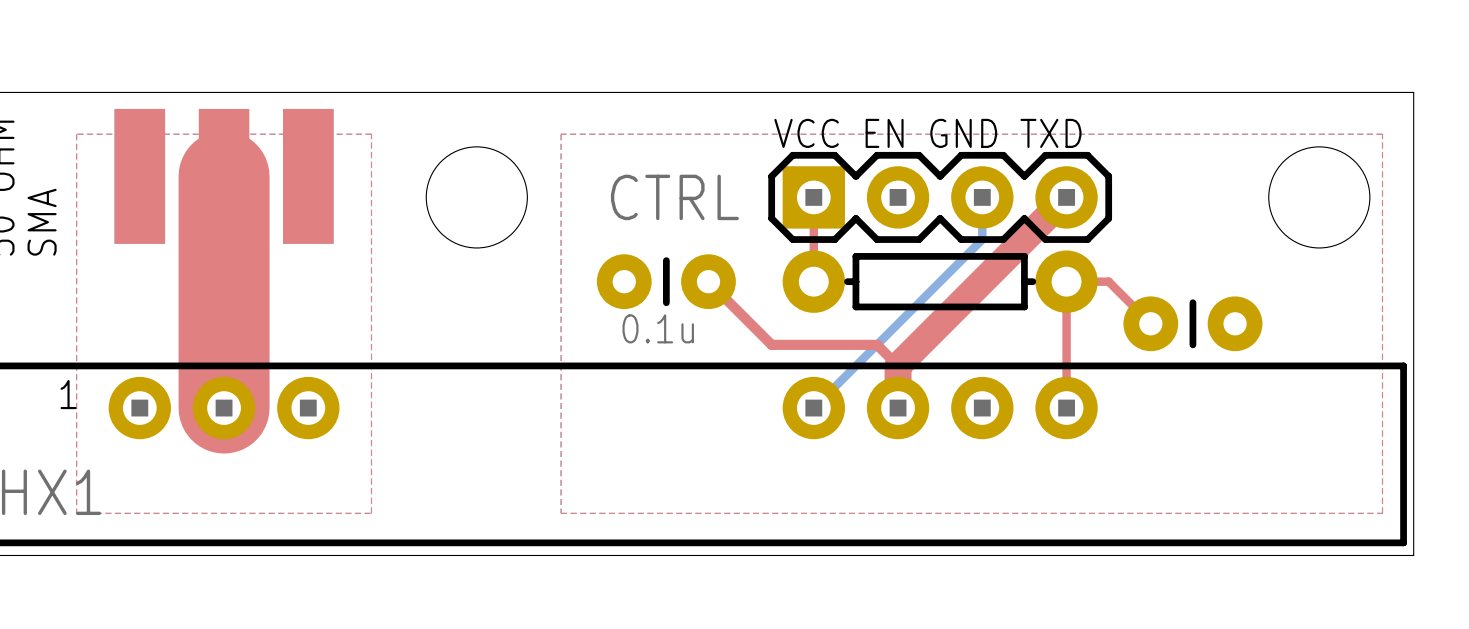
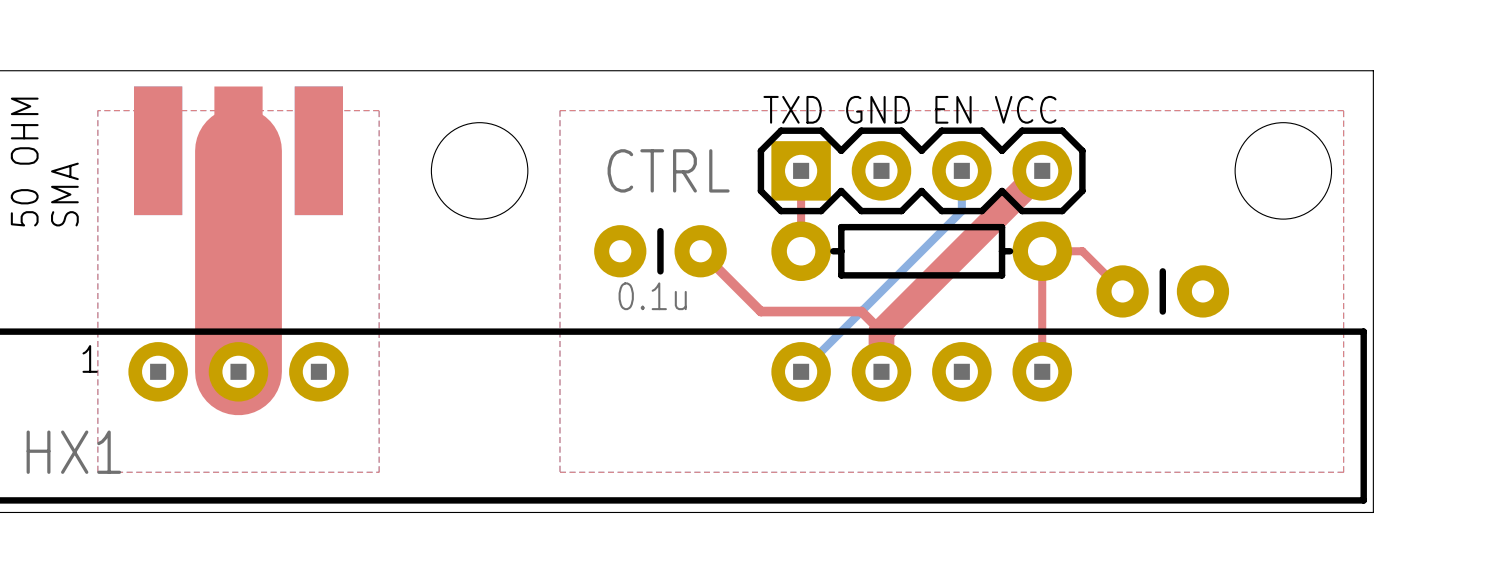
text: VCC EN GND TXD (927, 133) -> TXD GND EN VCC (909, 109)

